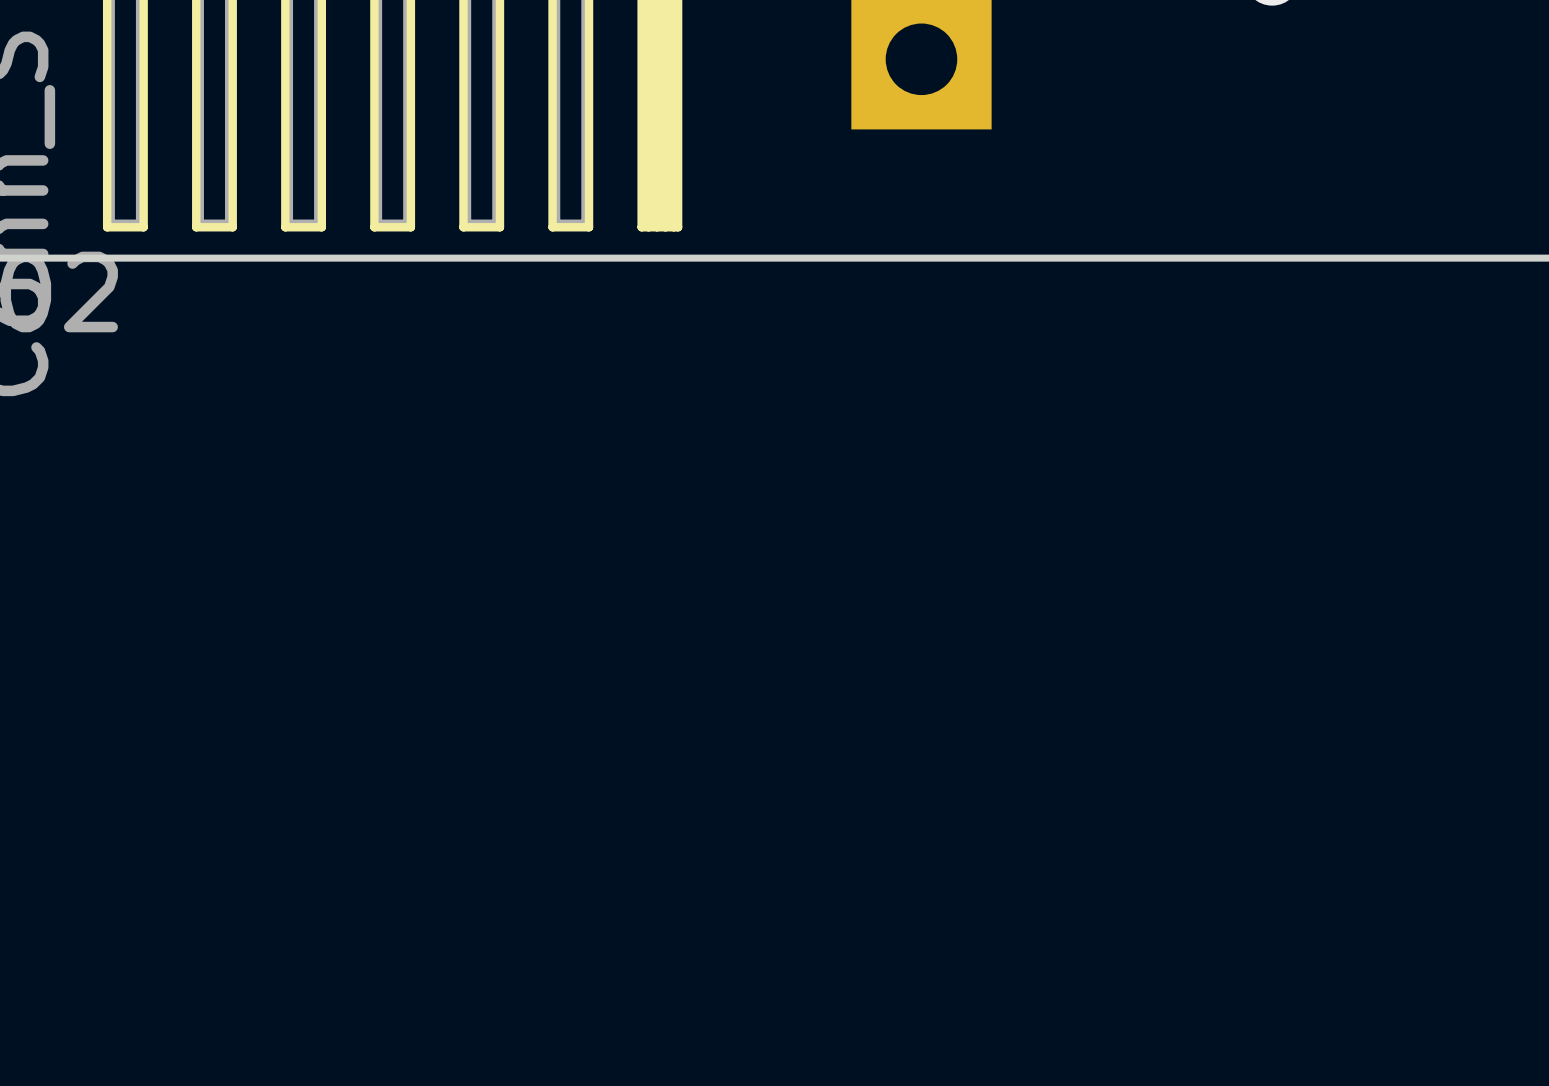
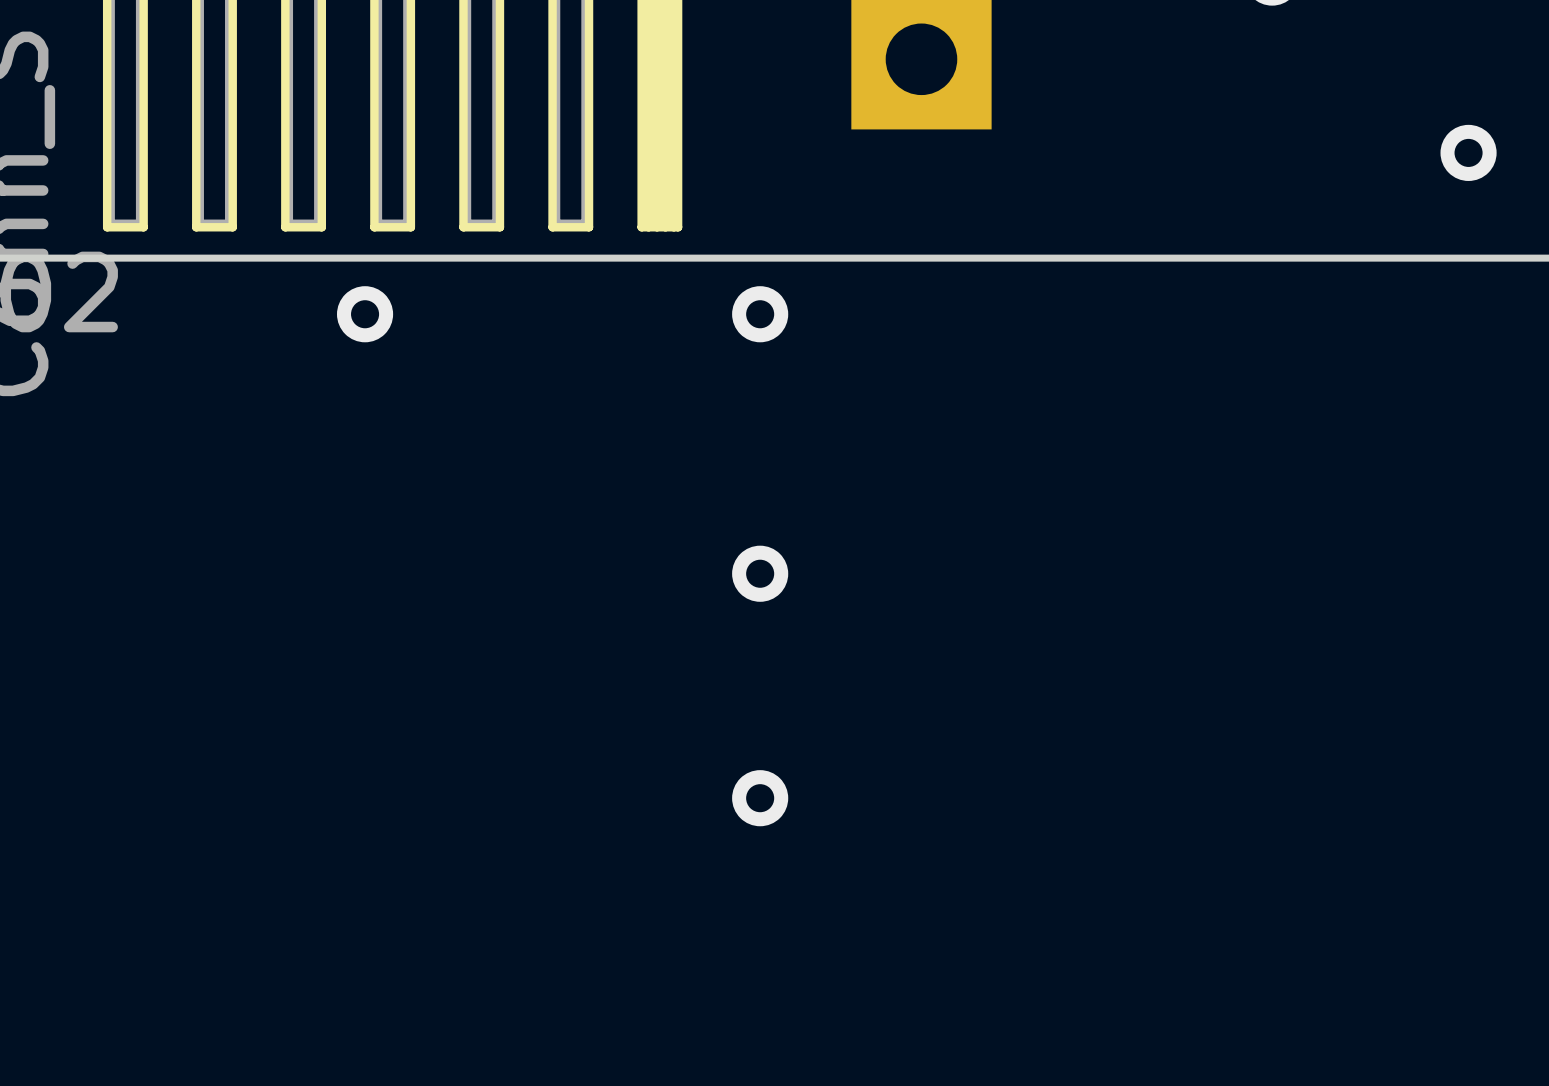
via: none -> (1468, 152)
via: none -> (365, 314)
via: none -> (760, 314)
via: none -> (760, 573)
via: none -> (760, 798)

